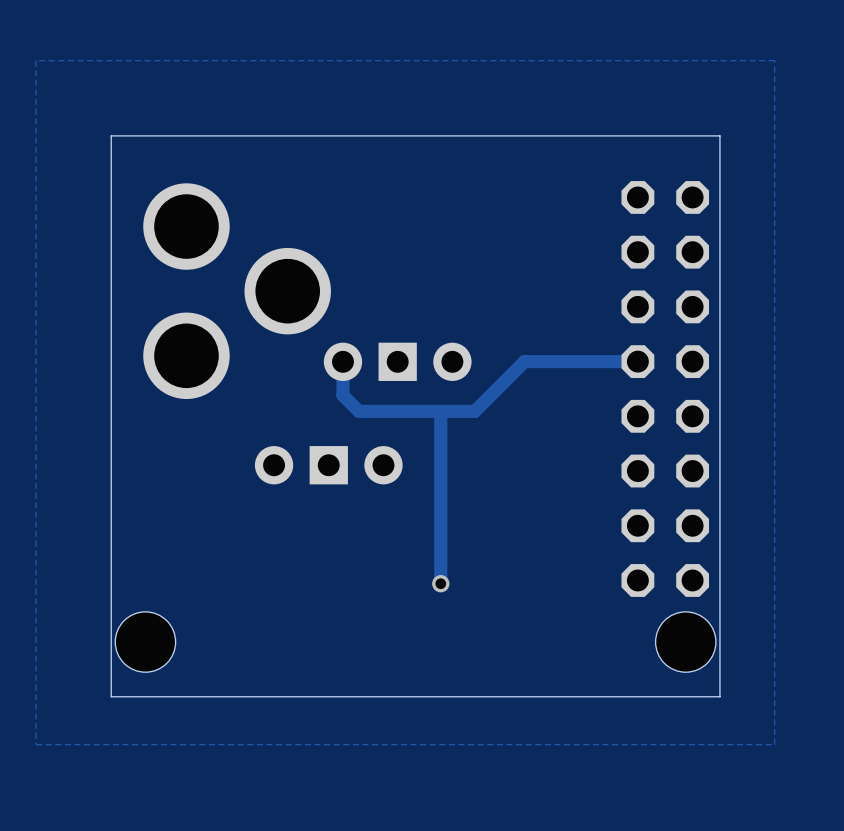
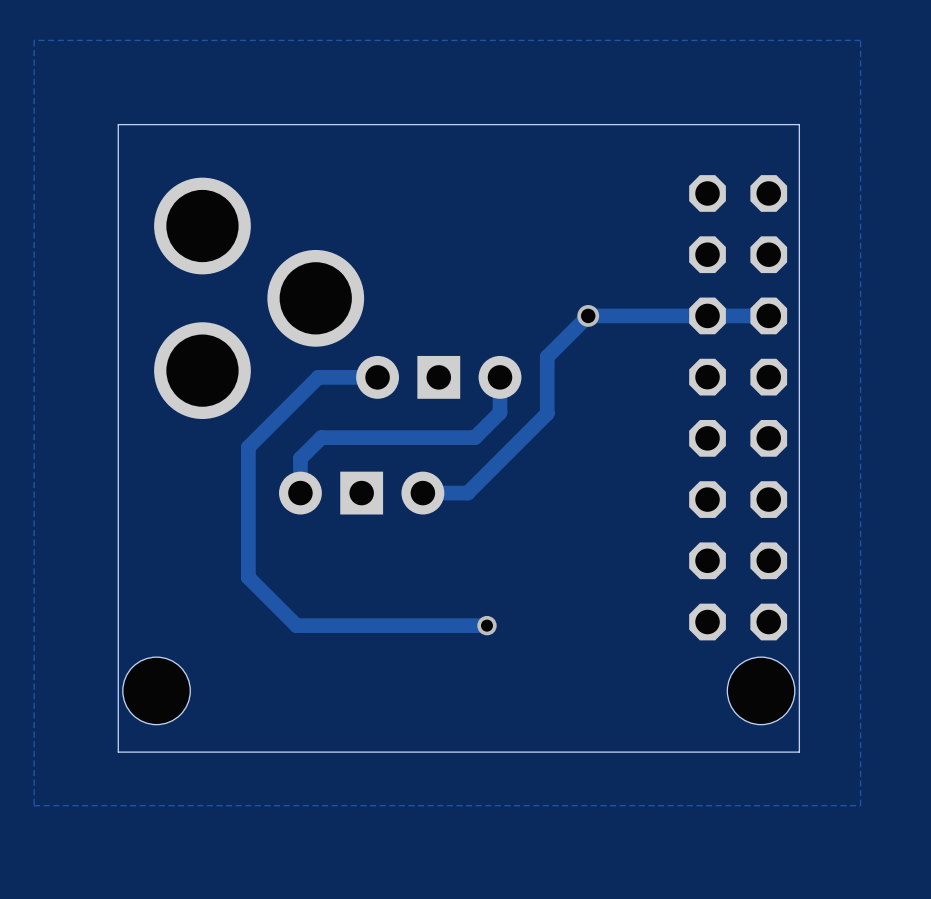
via: none -> (588, 315)
track: none -> (768, 315) (588, 315) (547, 356) (547, 413) (467, 493) (422, 493)
track: none -> (500, 377) (500, 412) (474, 437) (321, 437) (300, 458) (300, 493)
track: (637, 361) (524, 361) (474, 411) (358, 411) (342, 395) (342, 361) -> none
track: (440, 411) (440, 583) -> (377, 377) (318, 377) (248, 447) (248, 577) (296, 625) (486, 625)

